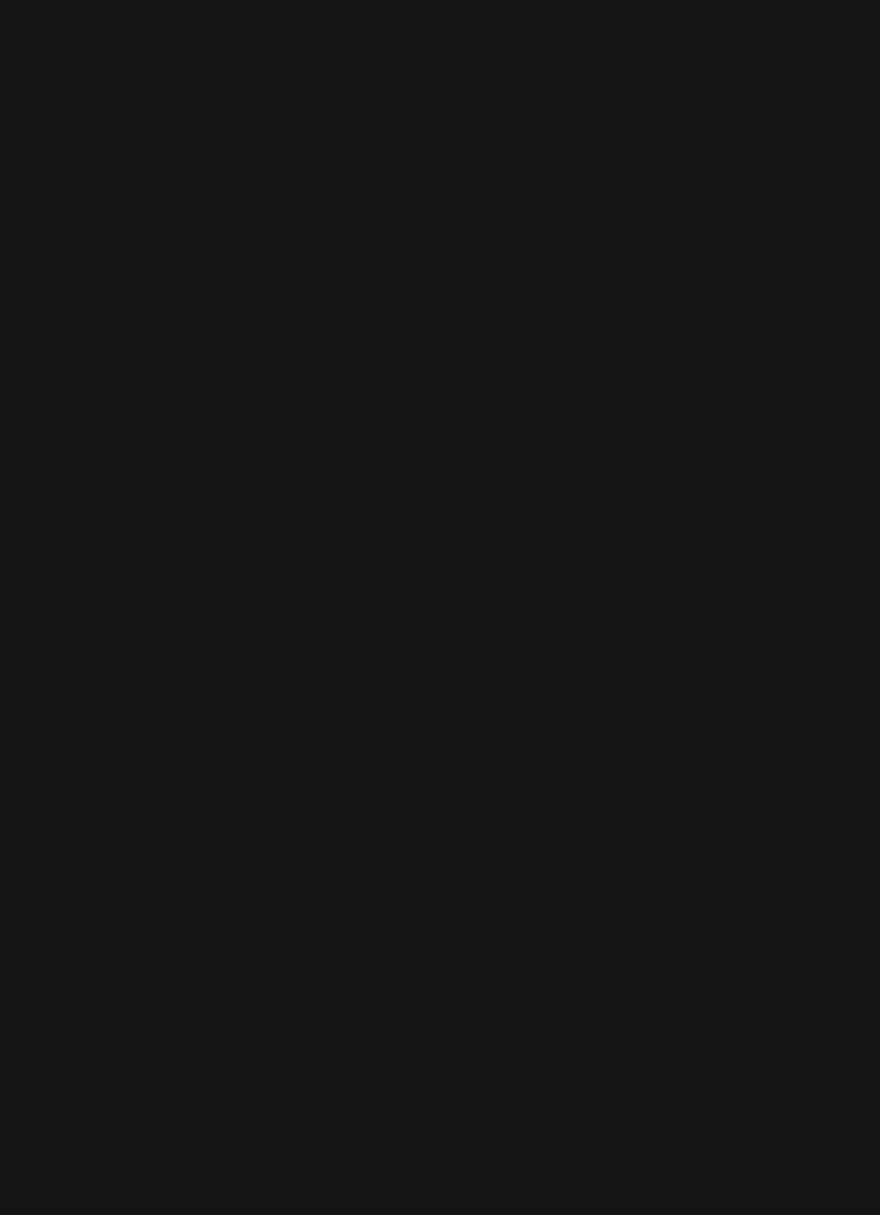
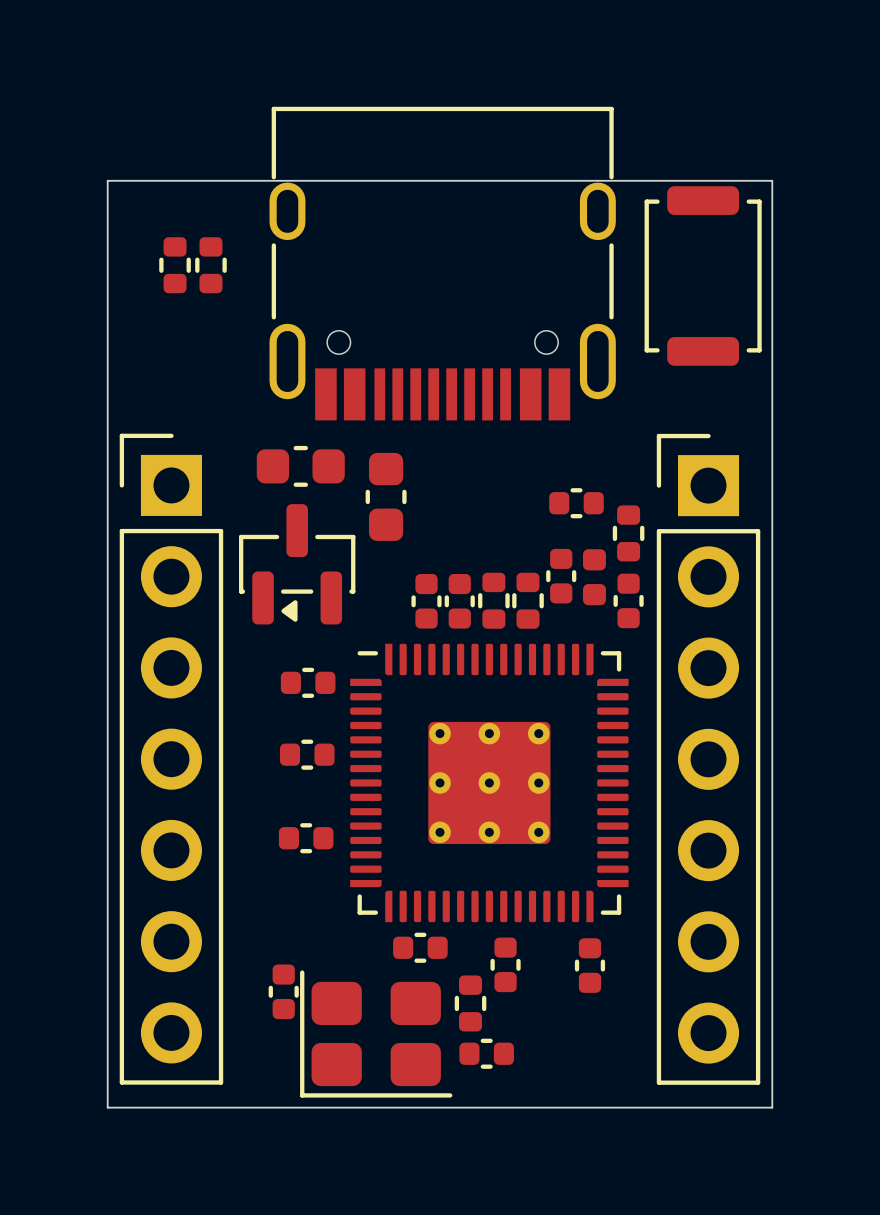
board edge: none -> (107, 180) (772, 180) (772, 1107) (107, 1107) (107, 180)
part: none -> (442, 263)
part: none -> (175, 265)
part: none -> (210, 265)
part: none -> (703, 276)
part: none -> (300, 466)
part: none -> (386, 496)
part: none -> (576, 503)
part: none -> (628, 533)
part: none -> (297, 564)
part: none -> (561, 576)
part: none -> (594, 577)
part: none -> (493, 600)
part: none -> (528, 600)
part: none -> (628, 600)
part: none -> (426, 601)
part: none -> (459, 601)
part: none -> (308, 682)
part: none -> (307, 754)
part: none -> (171, 759)
part: none -> (708, 759)
part: none -> (489, 782)
part: none -> (306, 838)
part: none -> (420, 947)
part: none -> (505, 964)
part: none -> (589, 965)
part: none -> (283, 991)
part: none -> (470, 1003)
part: none -> (376, 1033)
part: none -> (486, 1053)

